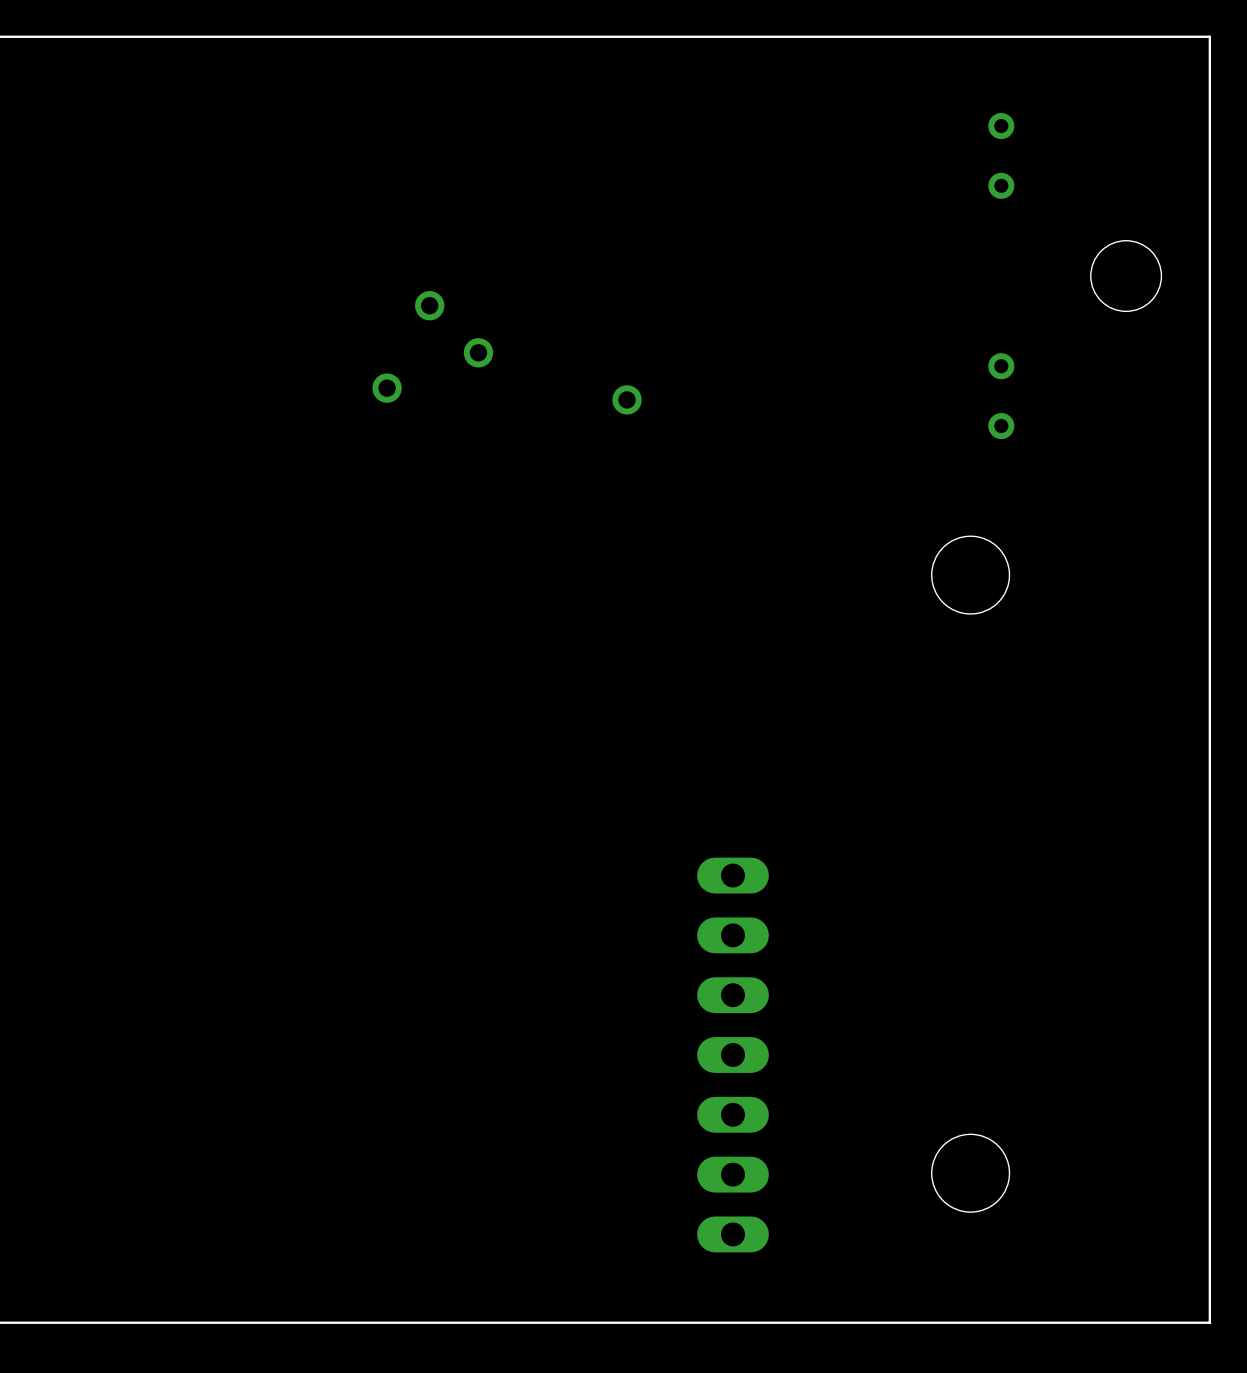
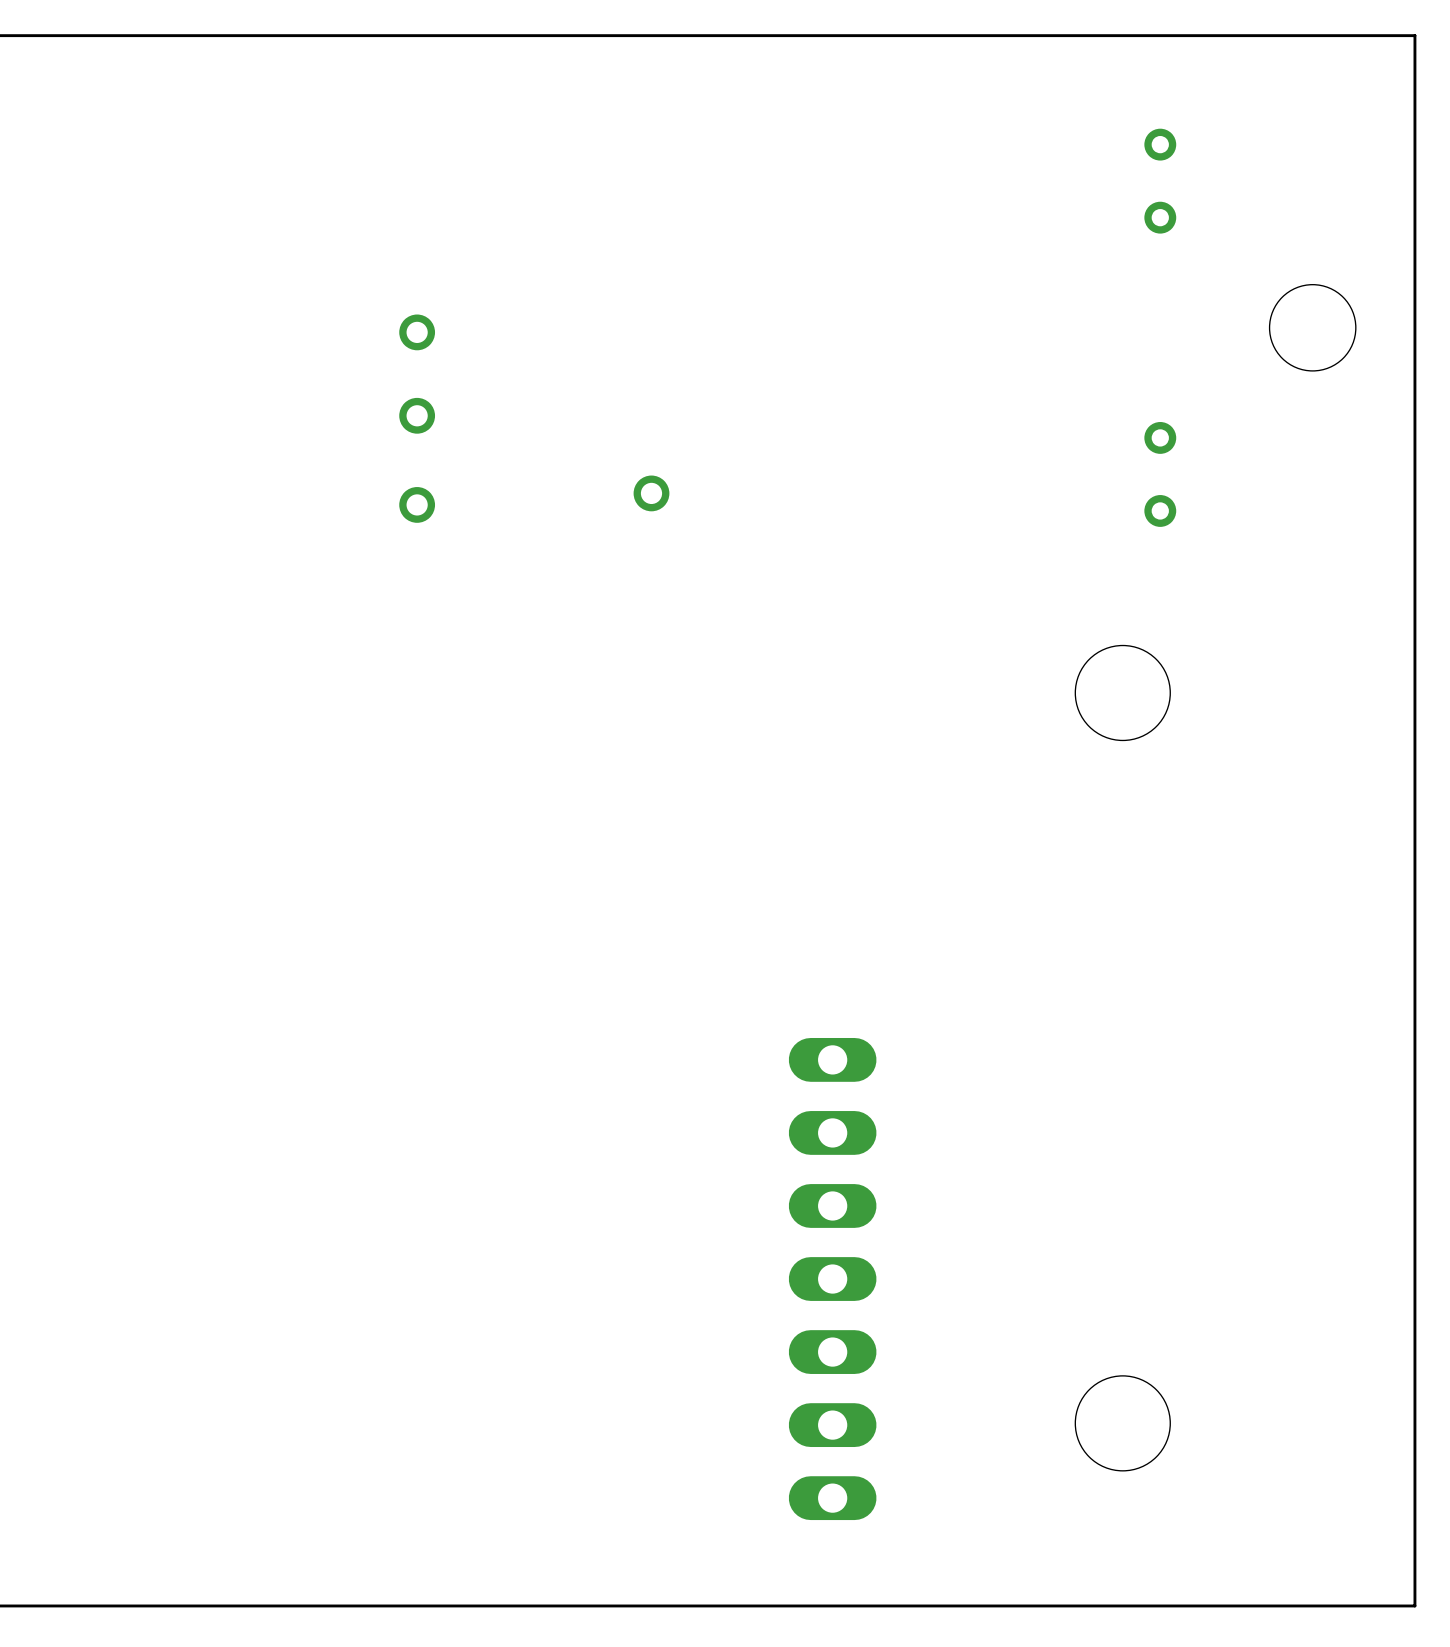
part: none -> (417, 332)
part: (429, 305) -> none
part: none -> (417, 415)
part: (478, 352) -> none
part: (387, 388) -> none
part position: (627, 399) -> (651, 493)
part: none -> (417, 504)

